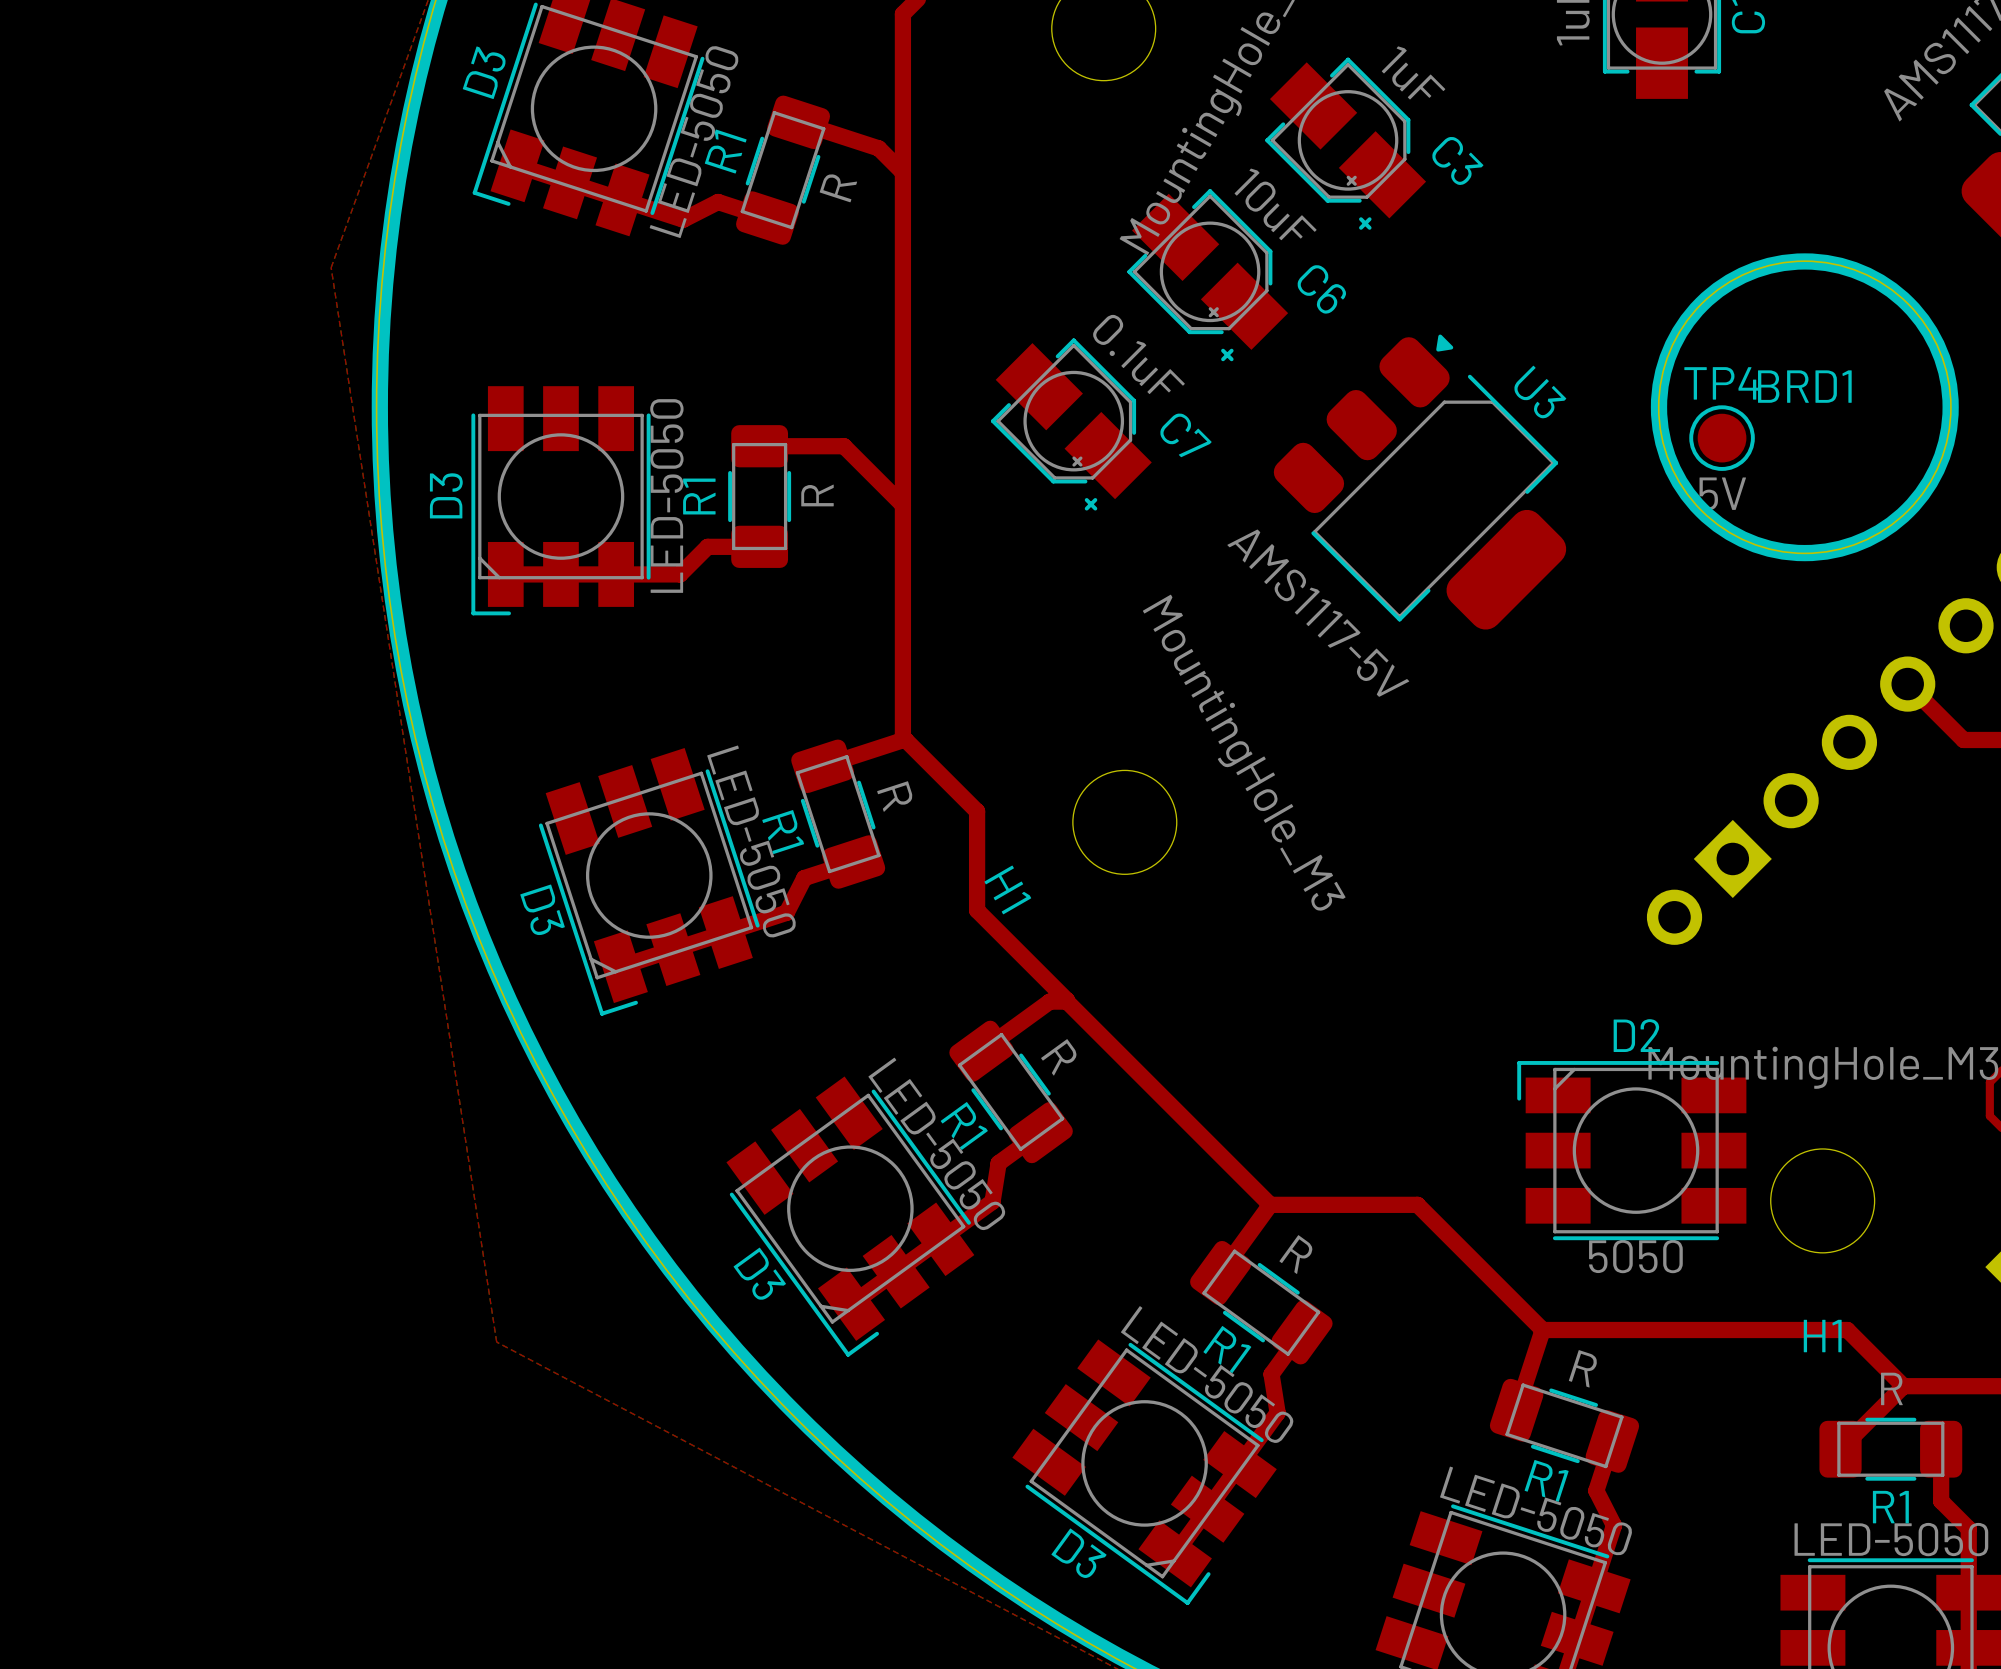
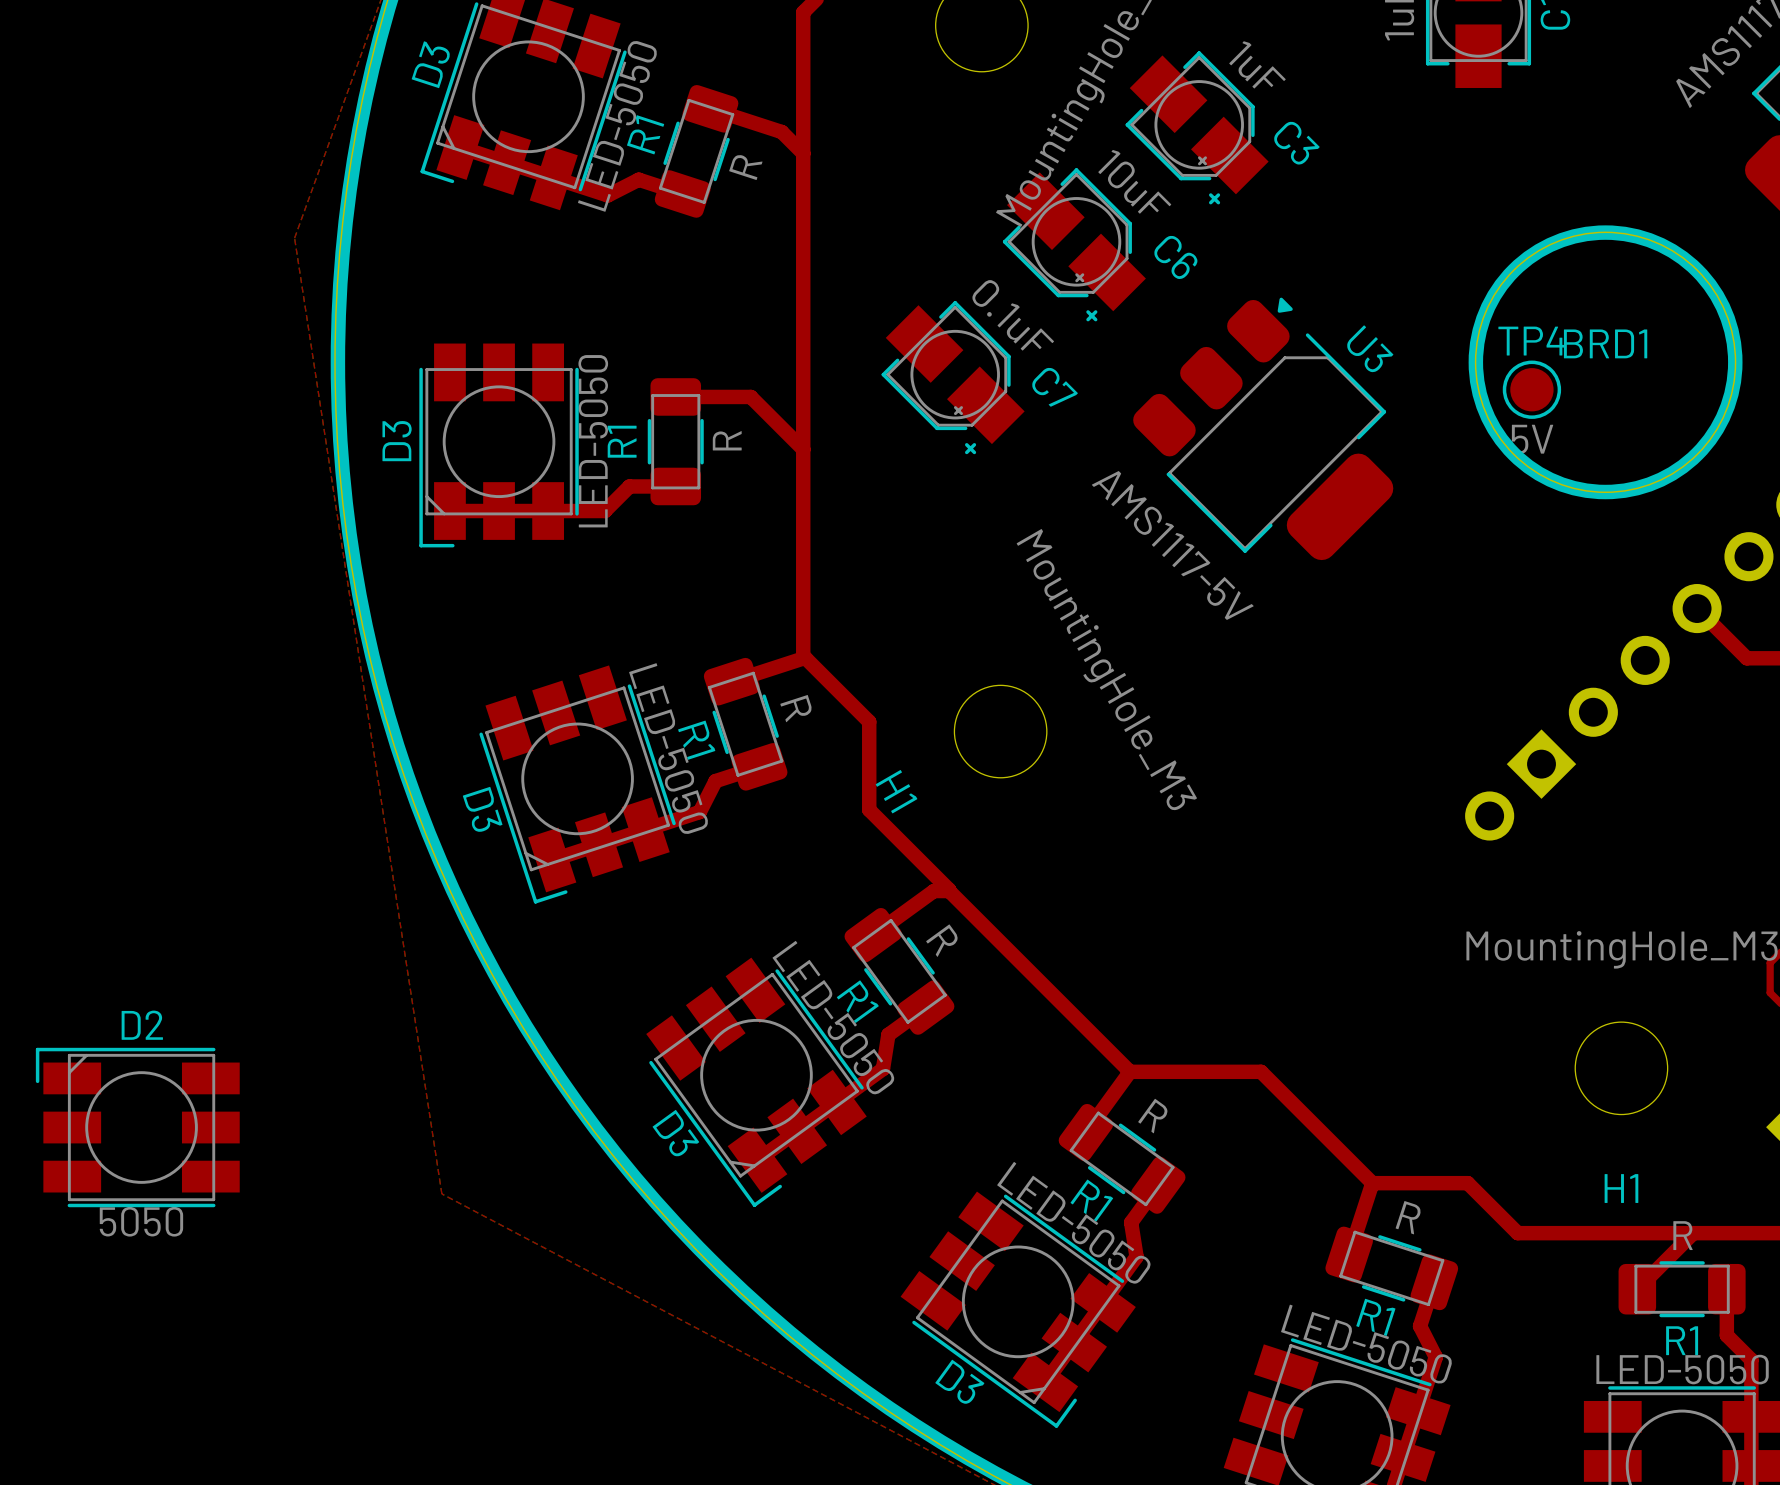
D2 position: (1631, 1150) -> (137, 1127)
top track: (1649, 1330) (1847, 1330) (1903, 1386) -> (1467, 1183) (1517, 1233) (1693, 1233)

